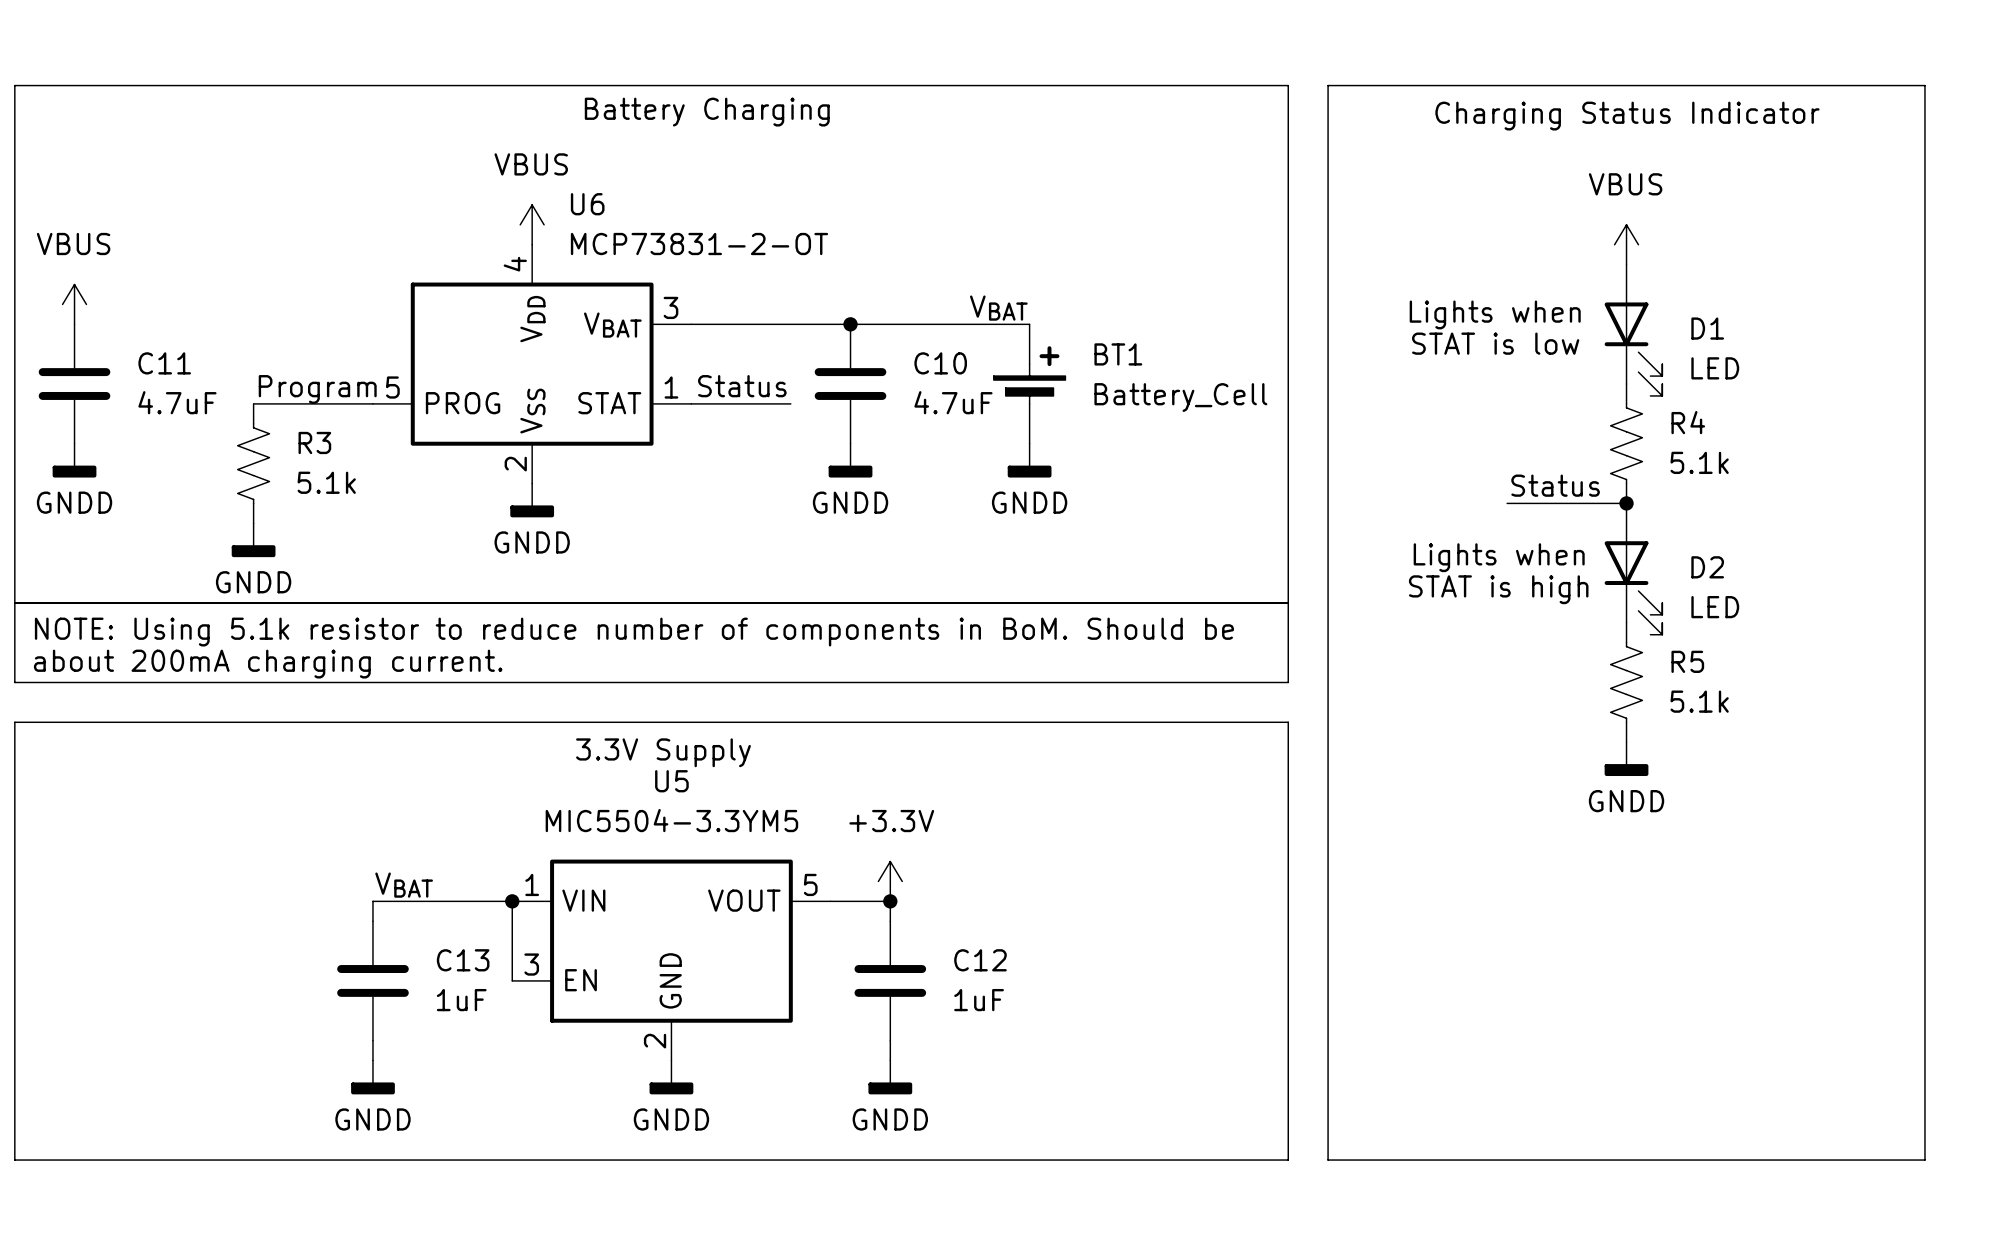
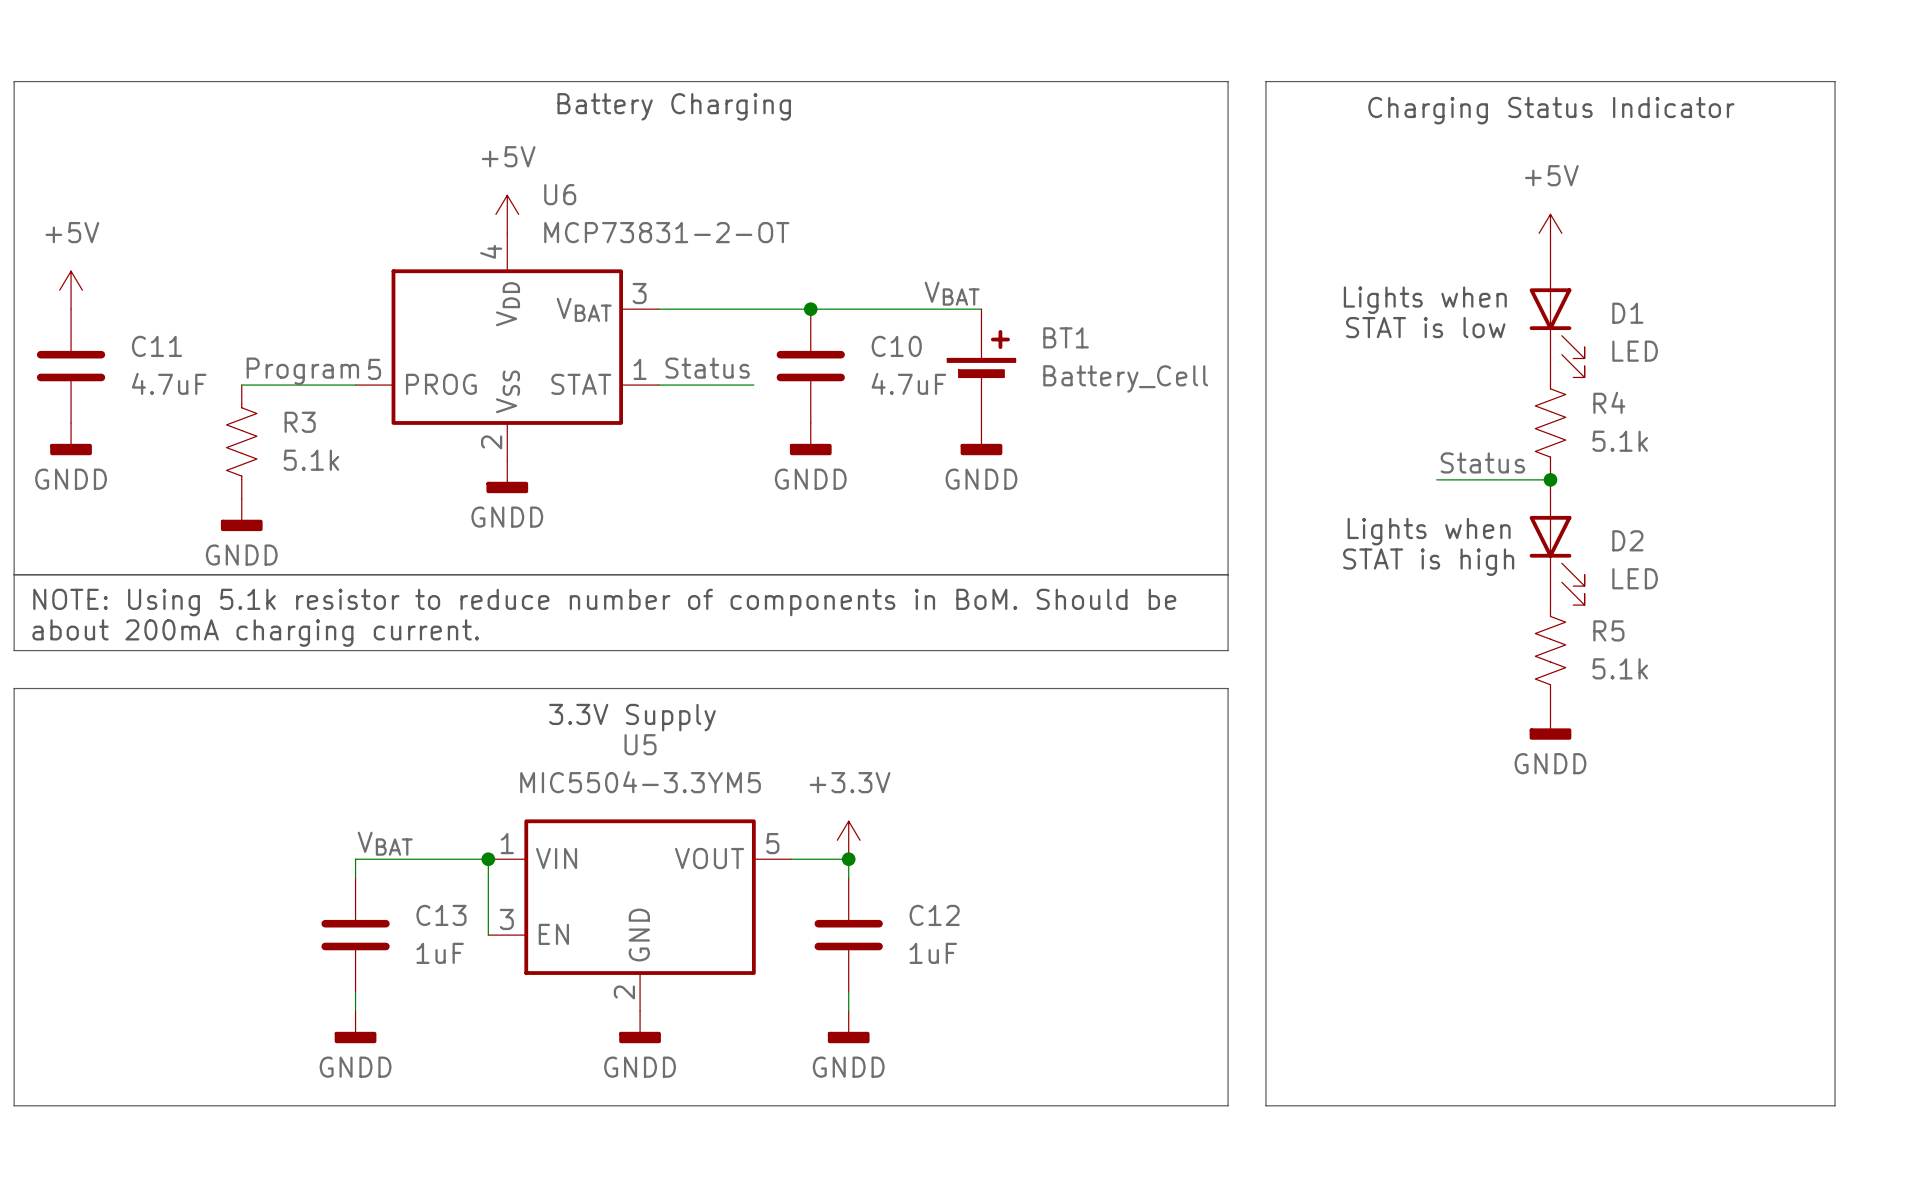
power symbol: VBUS (532, 224) -> +5V (507, 214)
power symbol: VBUS (1626, 244) -> +5V (1550, 233)
power symbol: VBUS (74, 304) -> +5V (71, 290)

